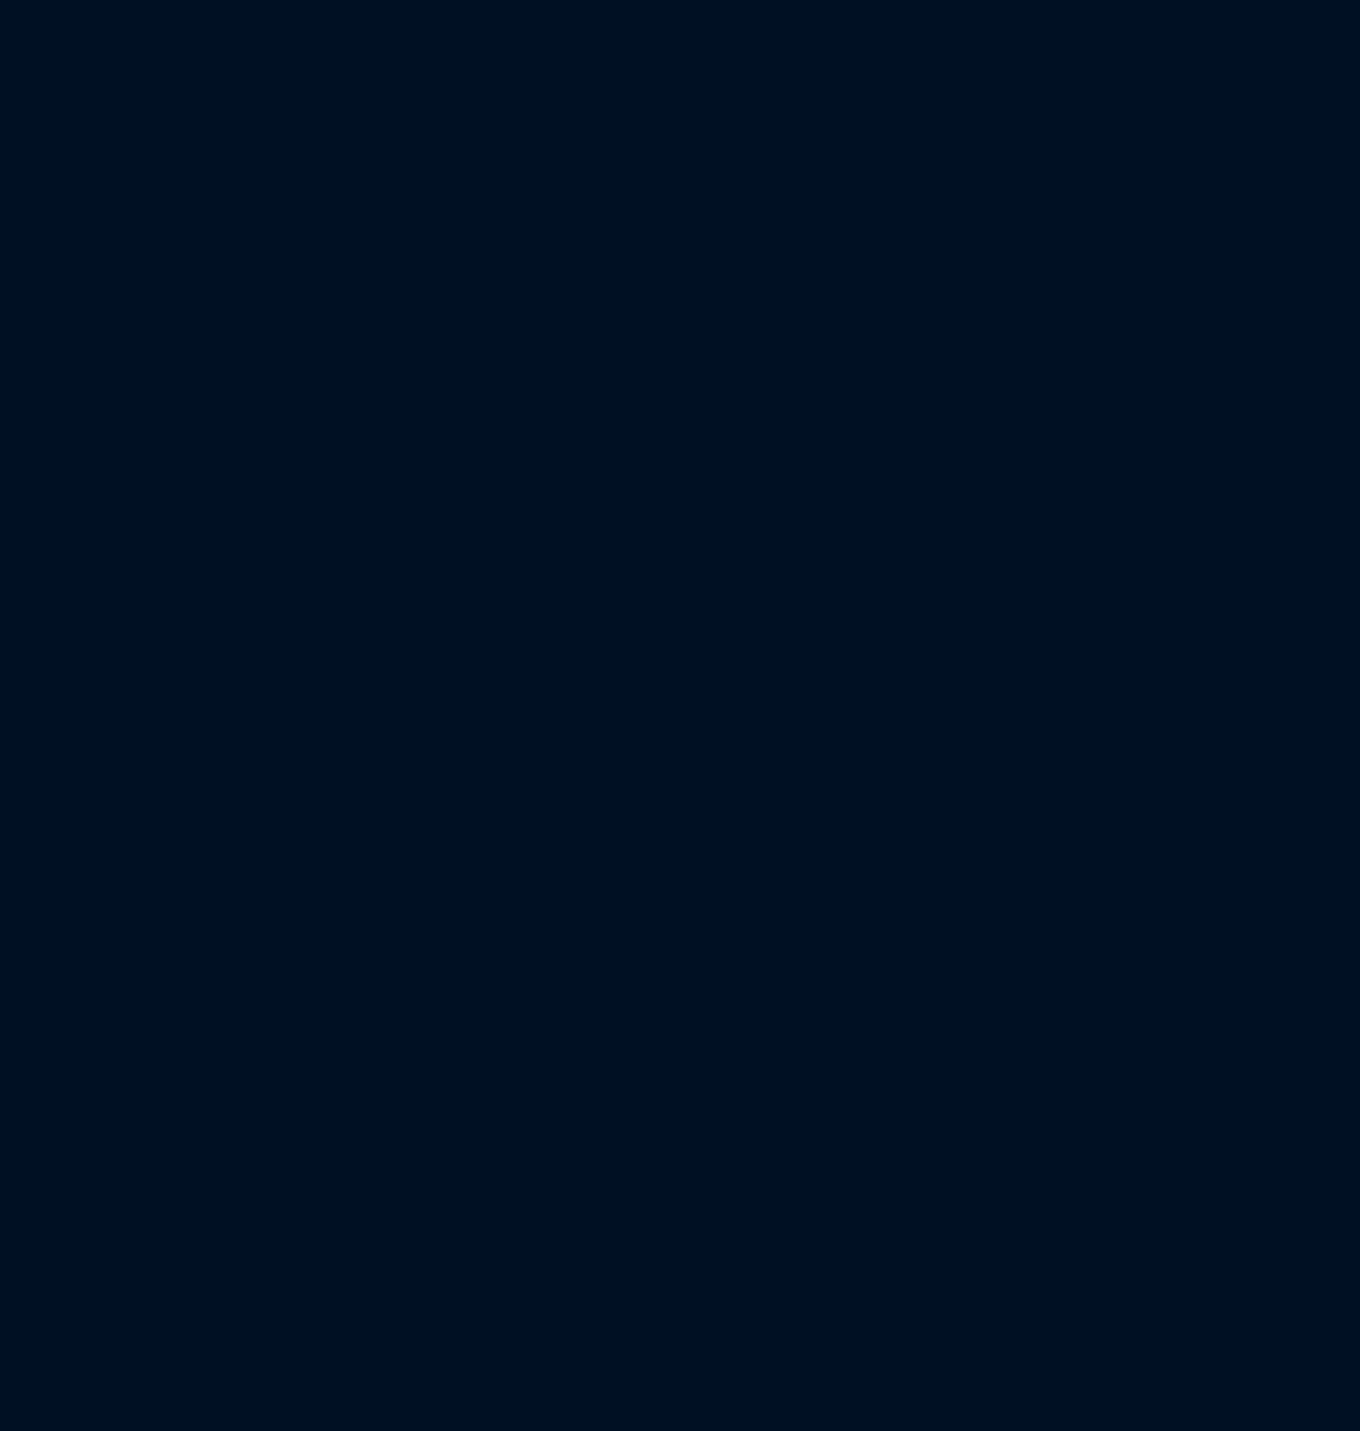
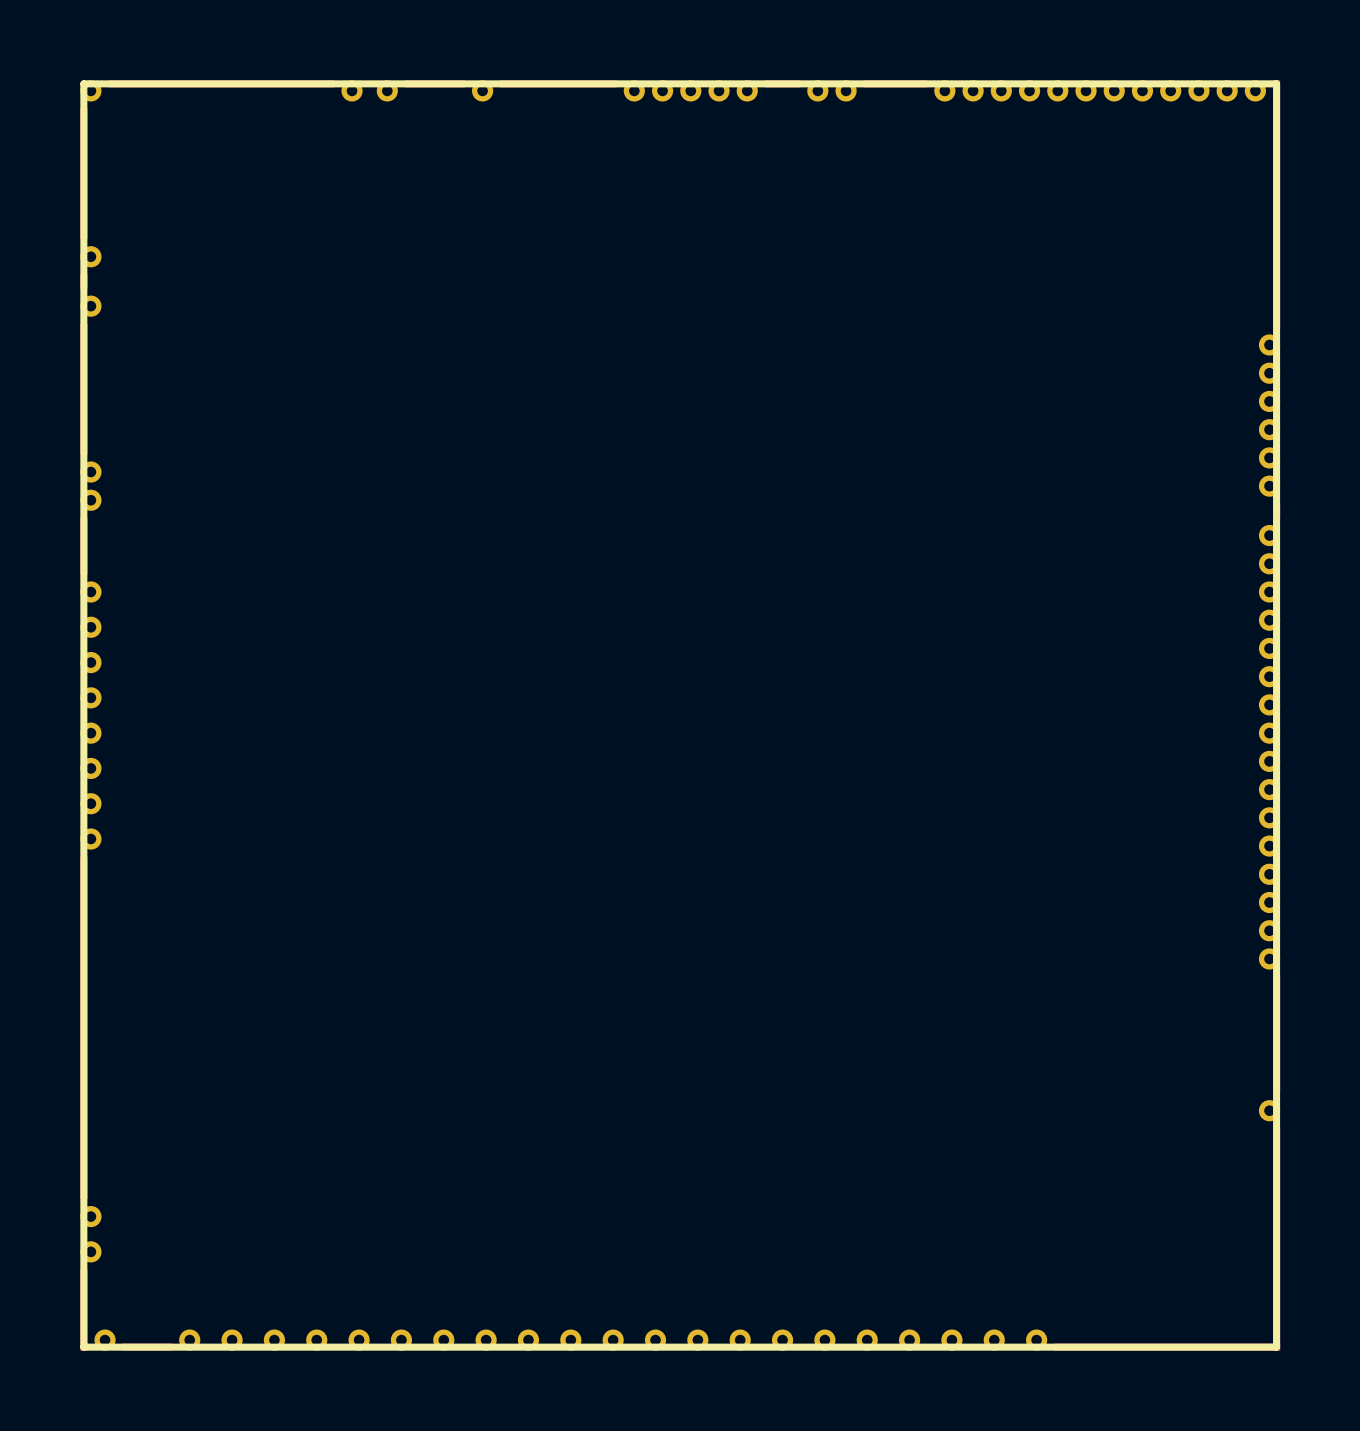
part: none -> (680, 715)

